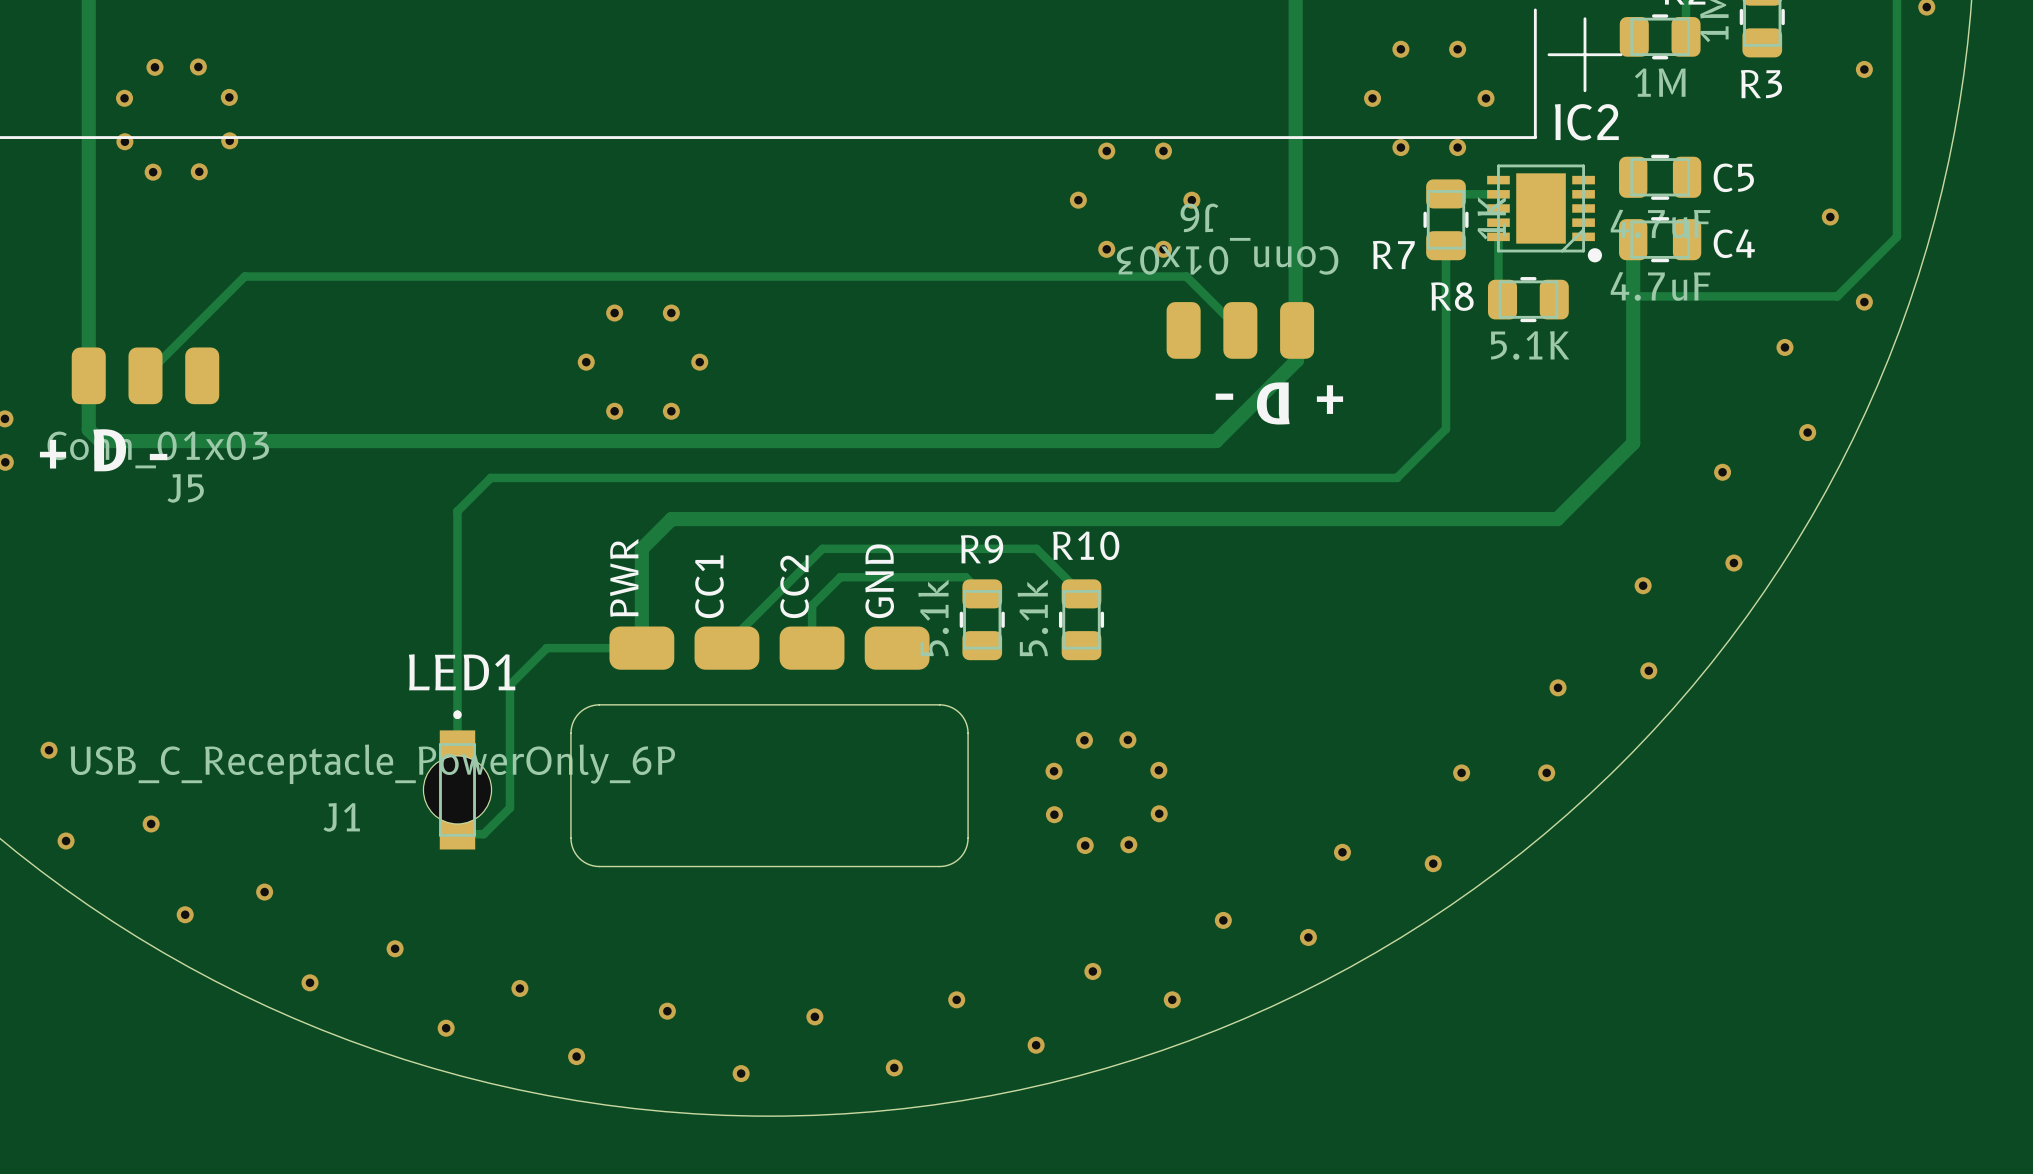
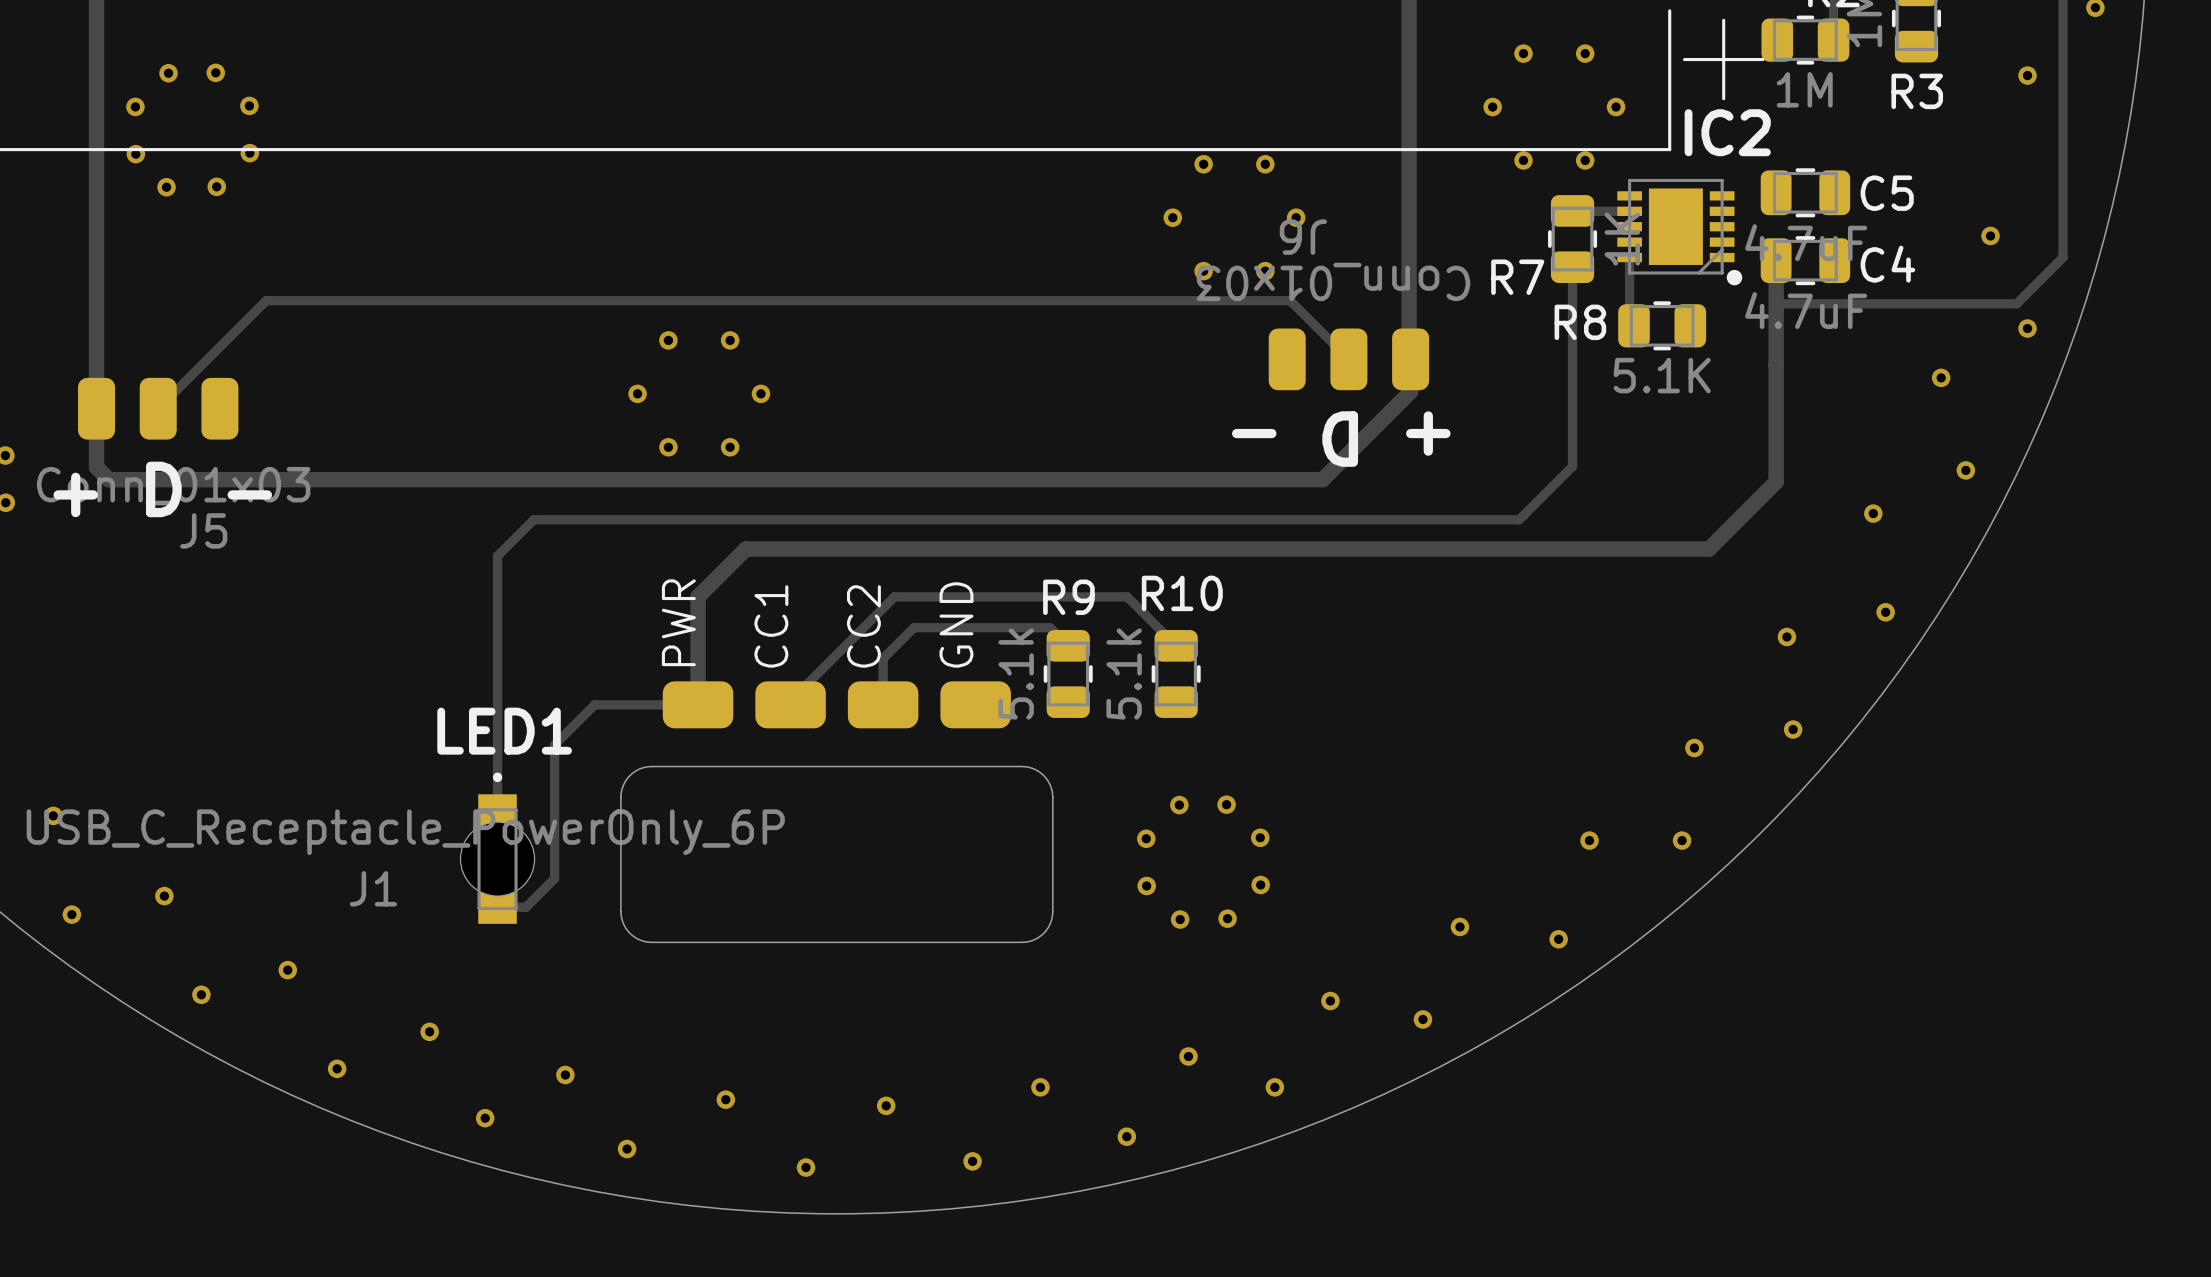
track: (1854, 279) (1837, 296) (1633, 296) -> (2016, 303) (1776, 303)
track: (1571, 504) (1557, 519) (671, 519) -> (1709, 549) (745, 549) (730, 564)

